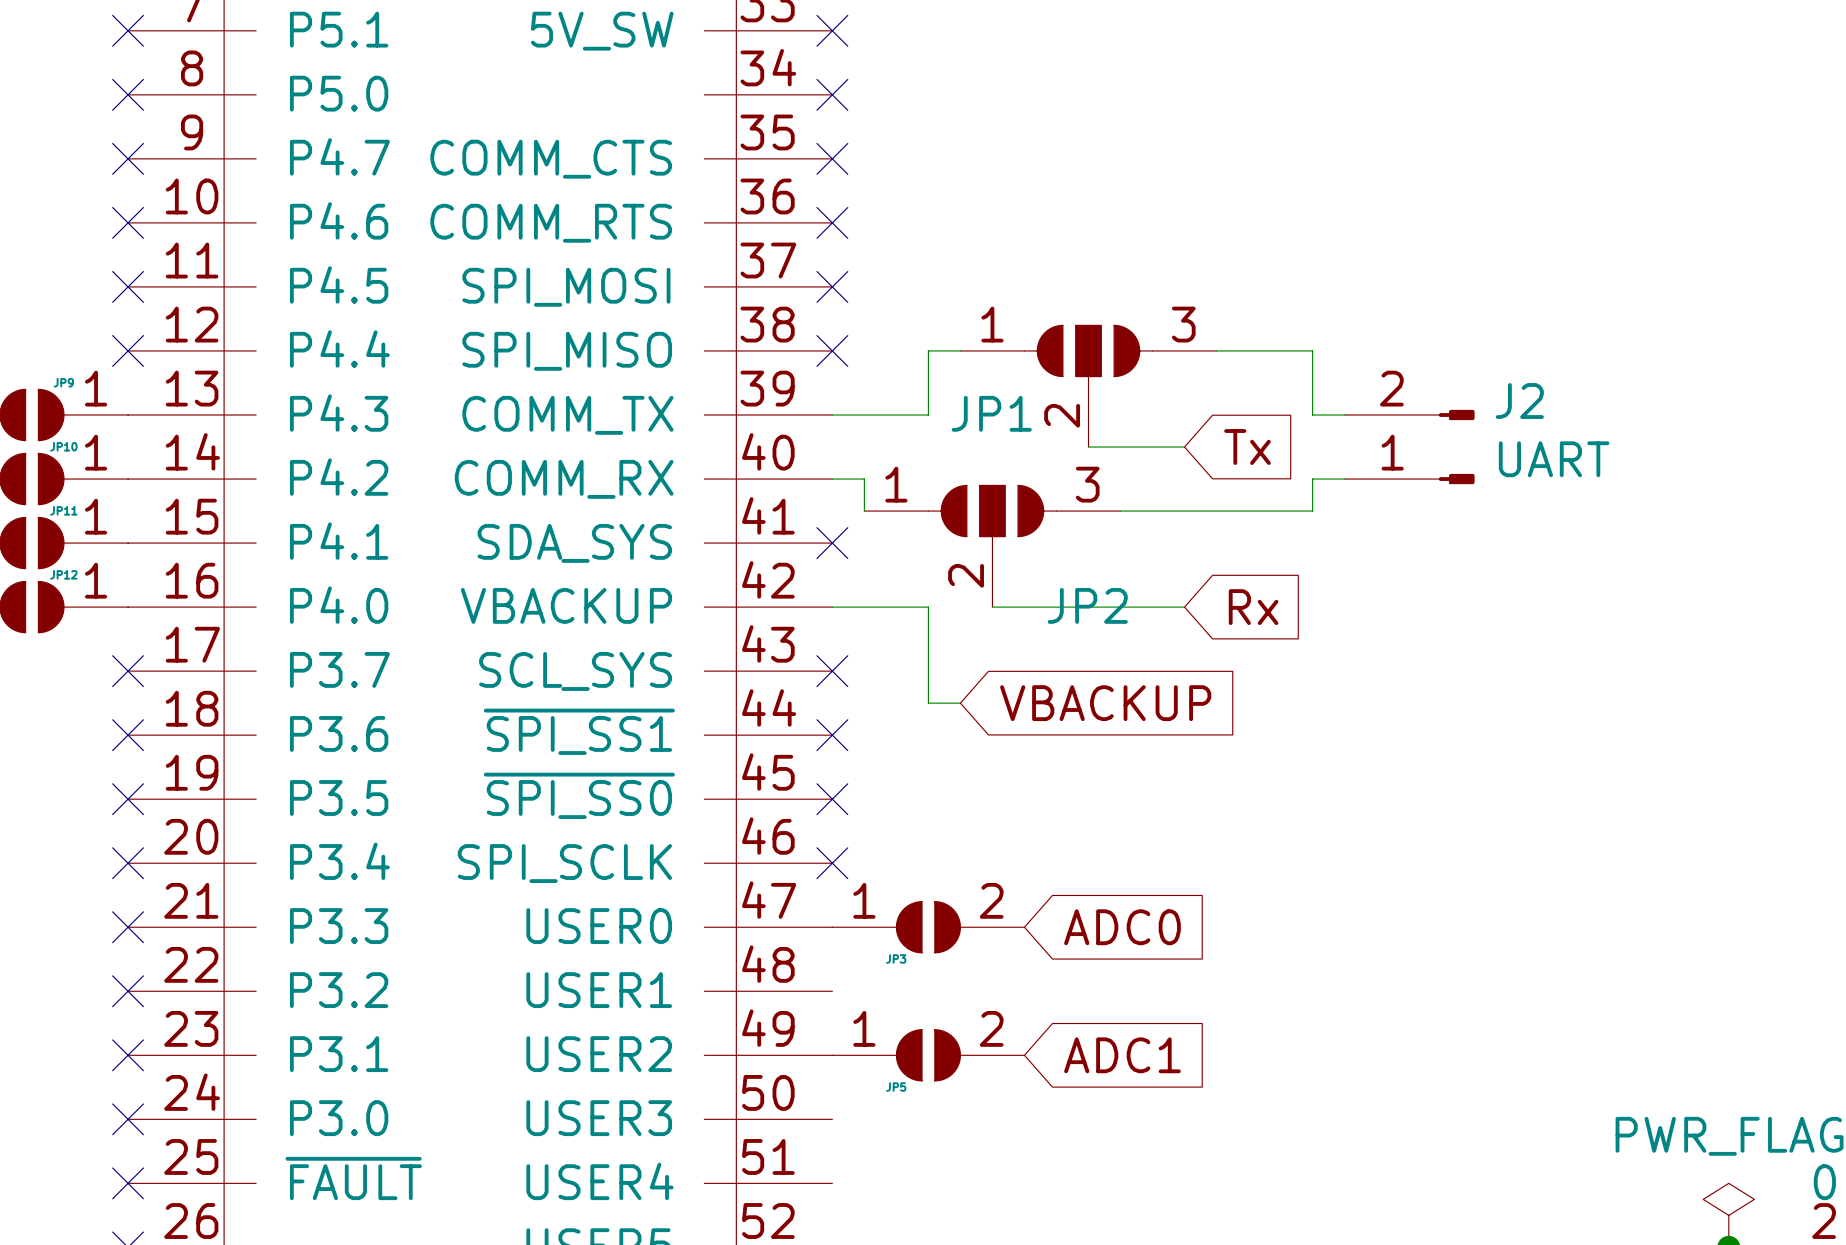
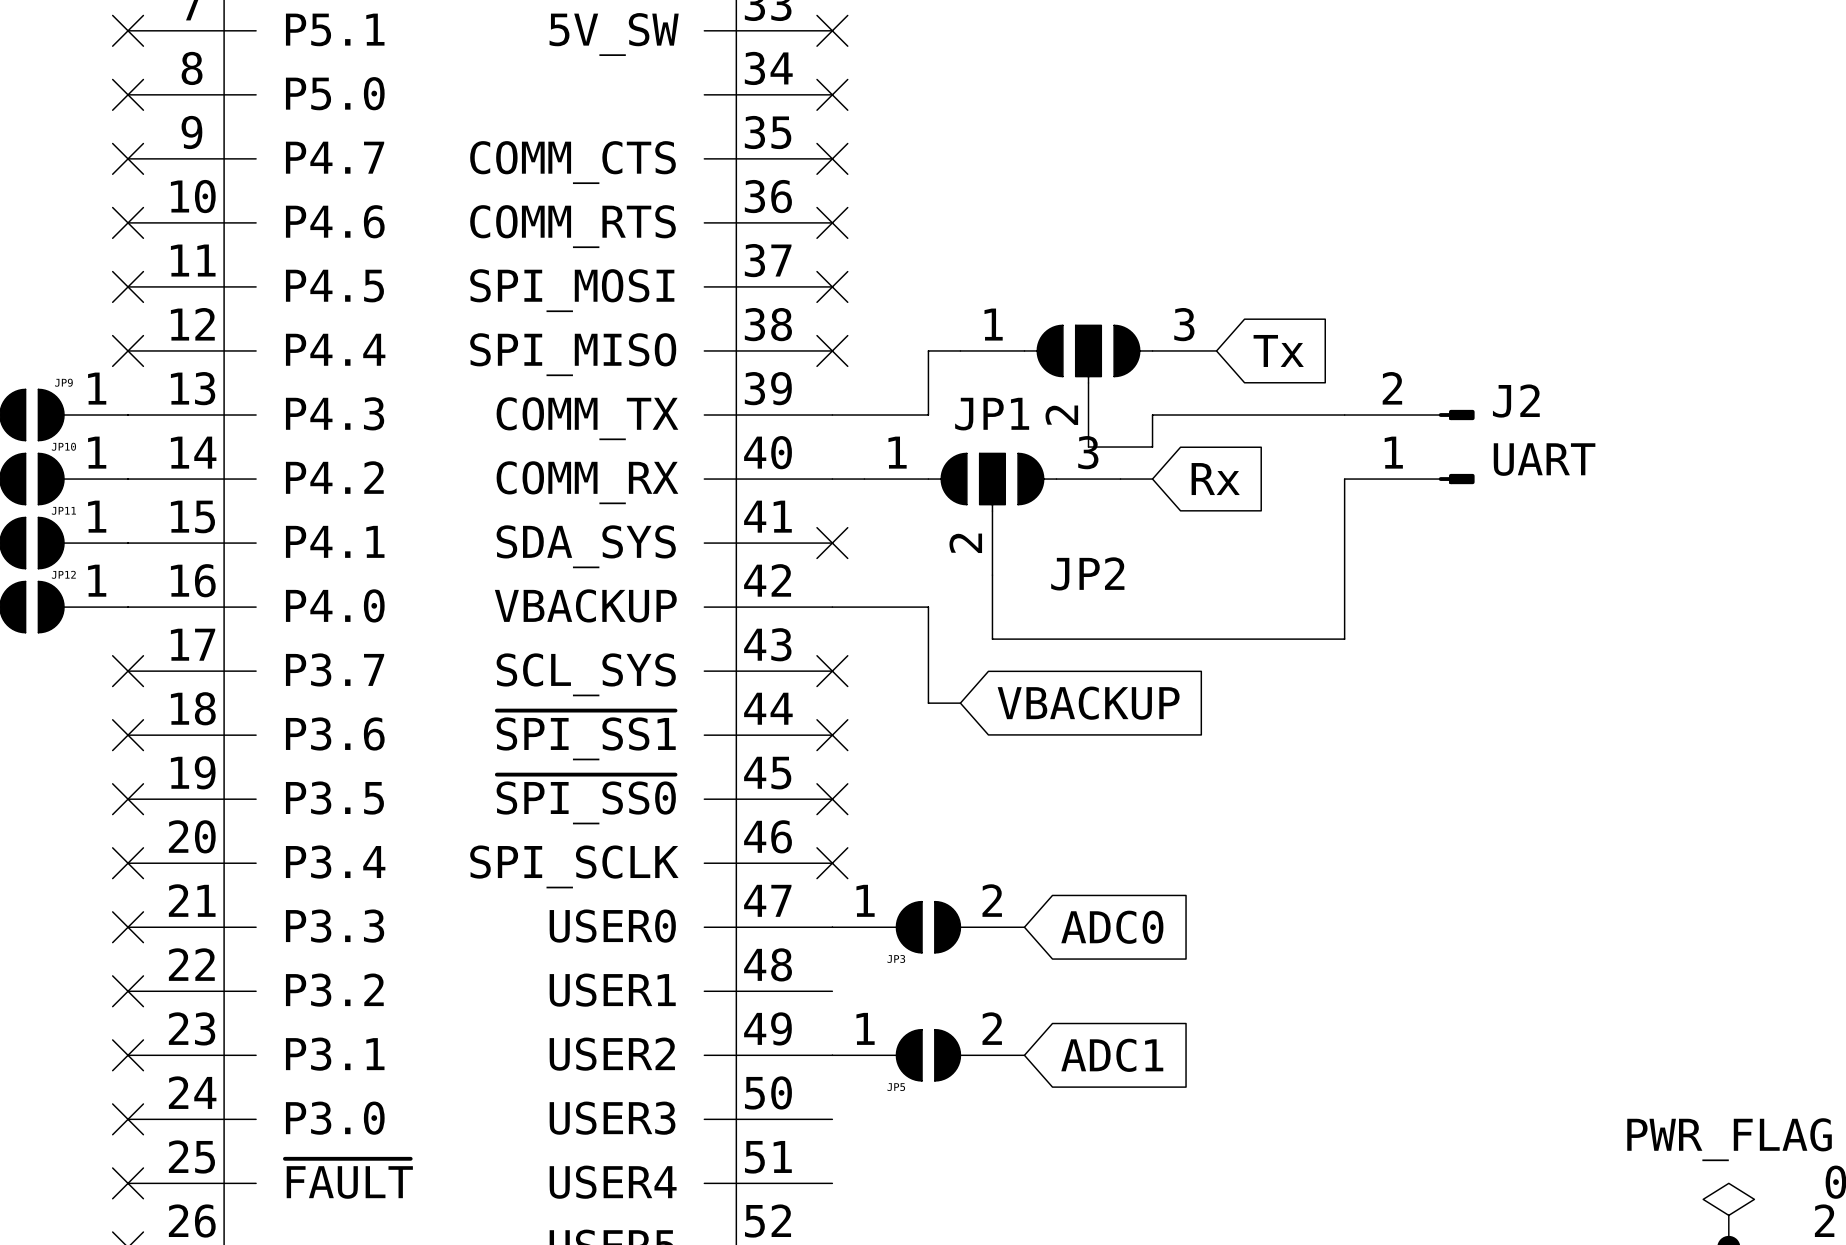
wire: (1216, 350) (1312, 350) (1312, 415) -> (1152, 447) (1152, 415) (1312, 415)
wire: (1152, 447) (1184, 447) -> (1120, 479) (1152, 479)
global label position: Tx (1247, 447) -> Tx (1278, 350)
wire: (864, 479) (864, 511) -> none
wire: (1344, 479) (1312, 479) (1312, 511) (1120, 511) -> (1344, 479) (1344, 639) (992, 639) (992, 575)
JP2 position: (992, 546) -> (992, 514)
wire: (992, 607) (1184, 607) -> none
global label position: Rx (1253, 607) -> Rx (1215, 479)

